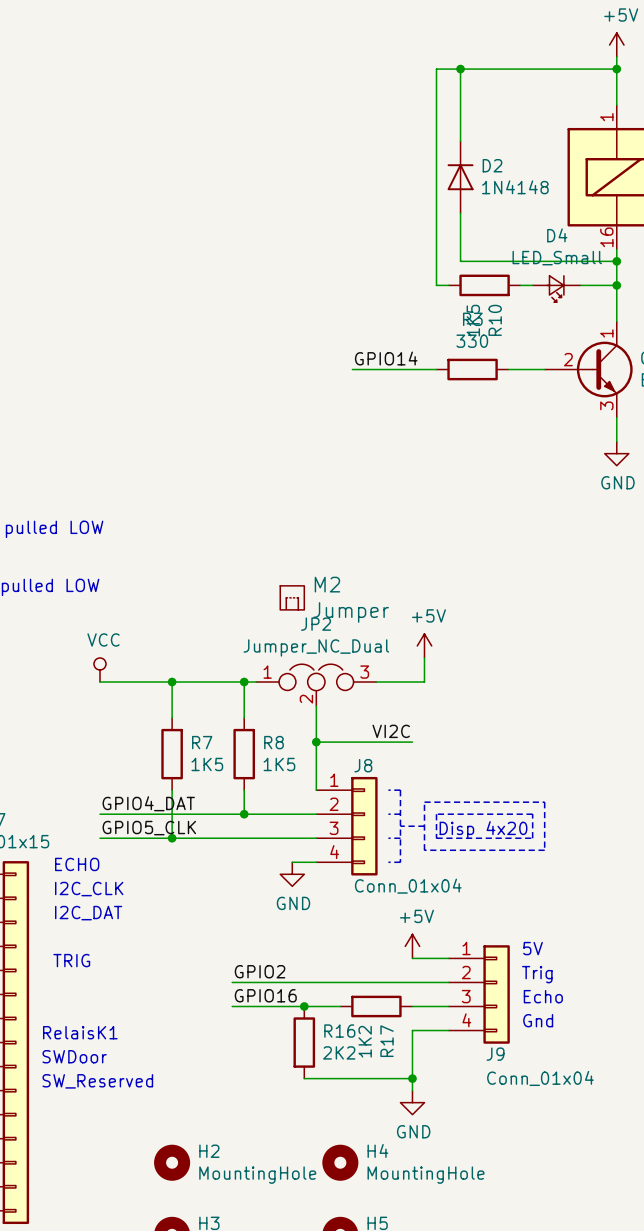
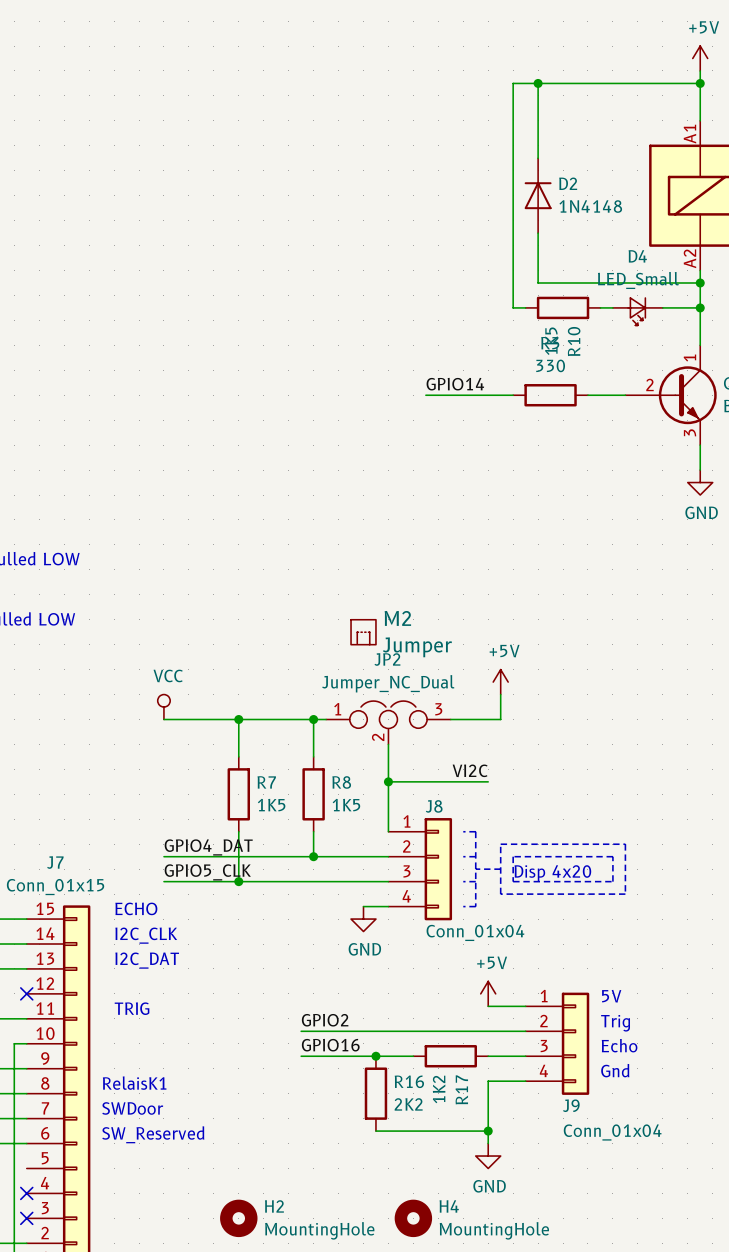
part pin number: 1 (606, 117) -> A1 (689, 134)
part pin number: 16 (606, 237) -> A2 (689, 258)

